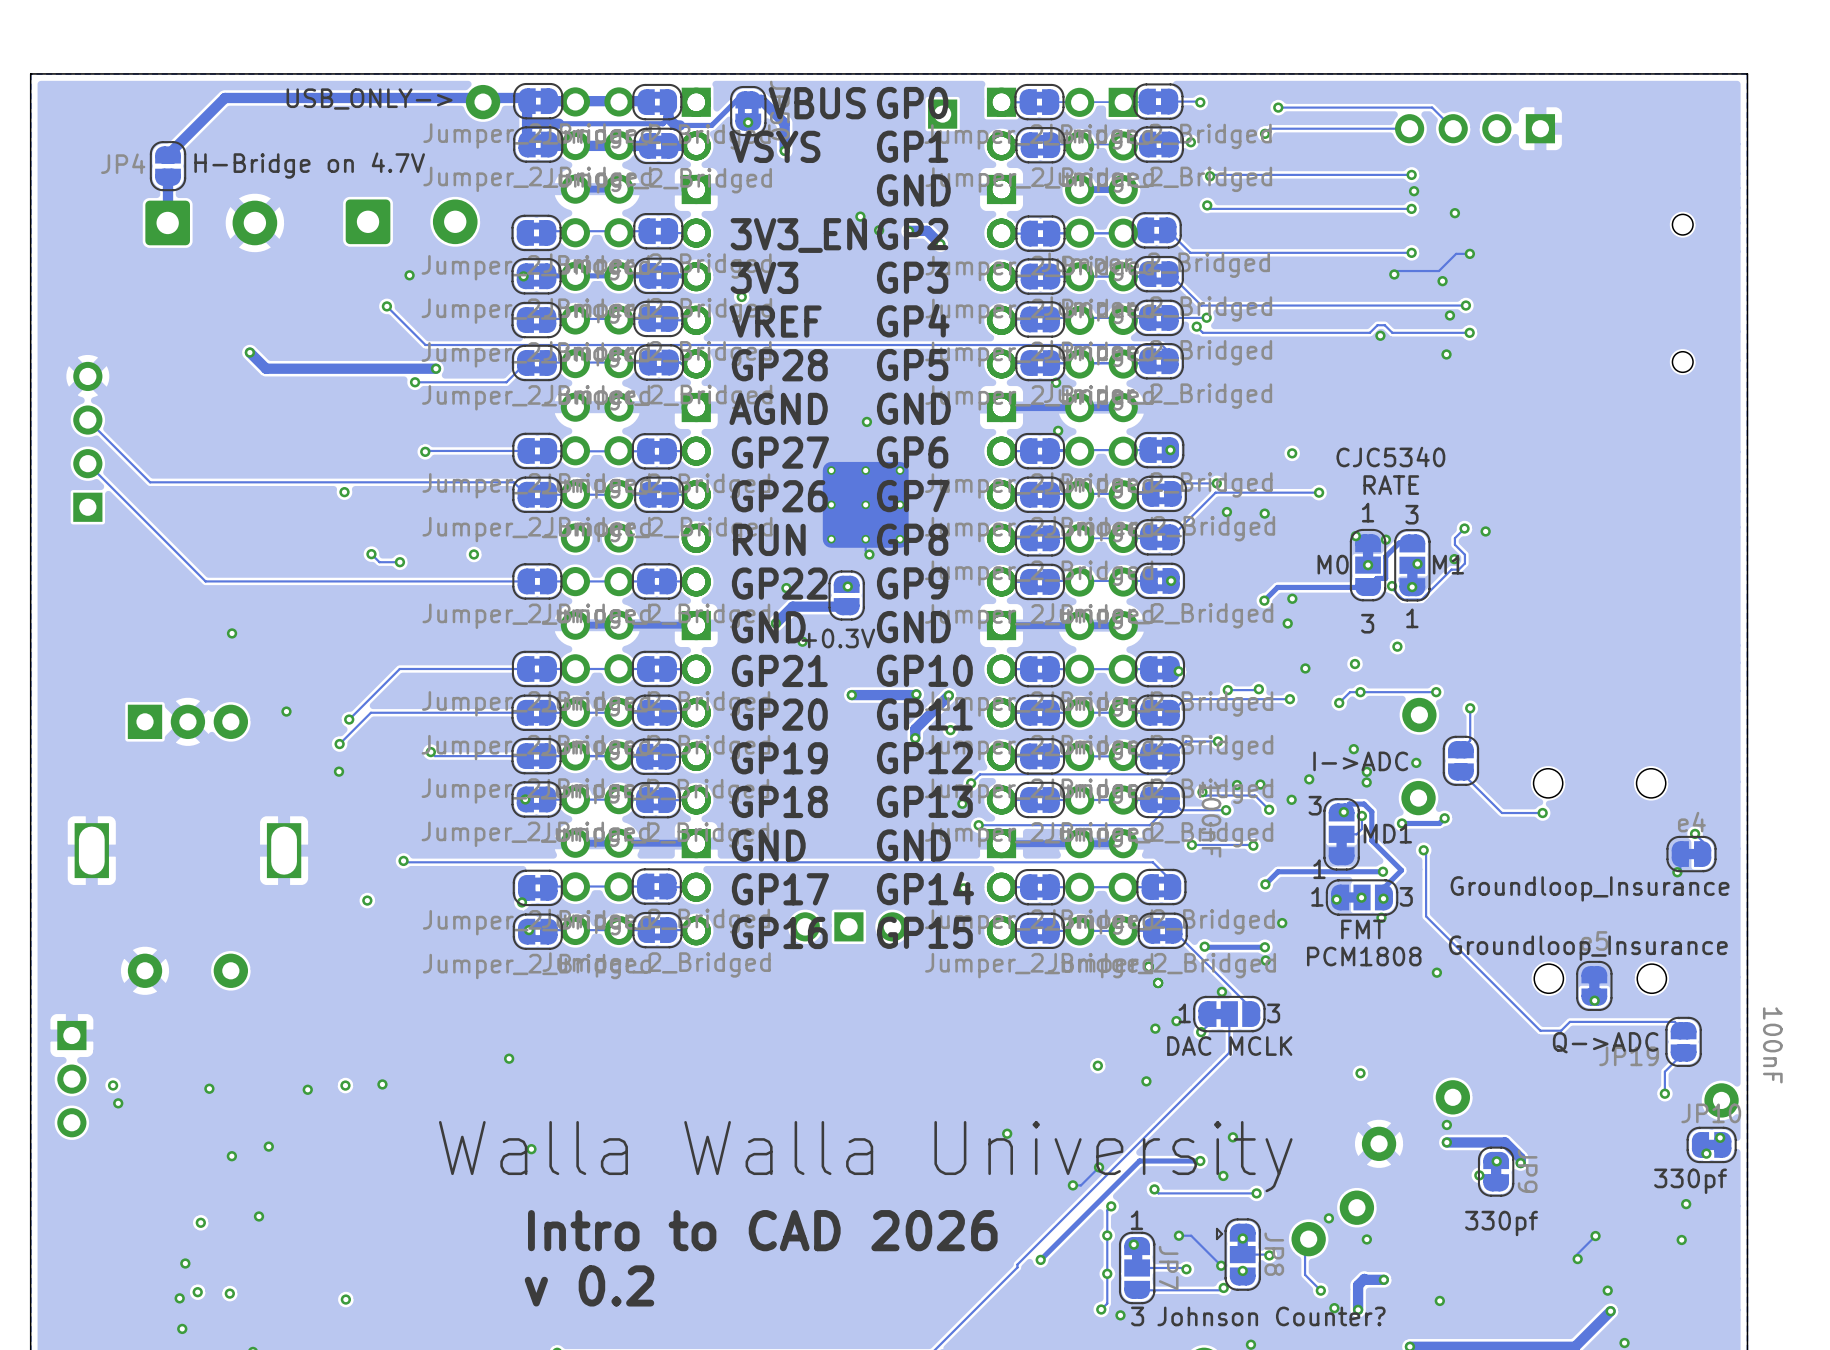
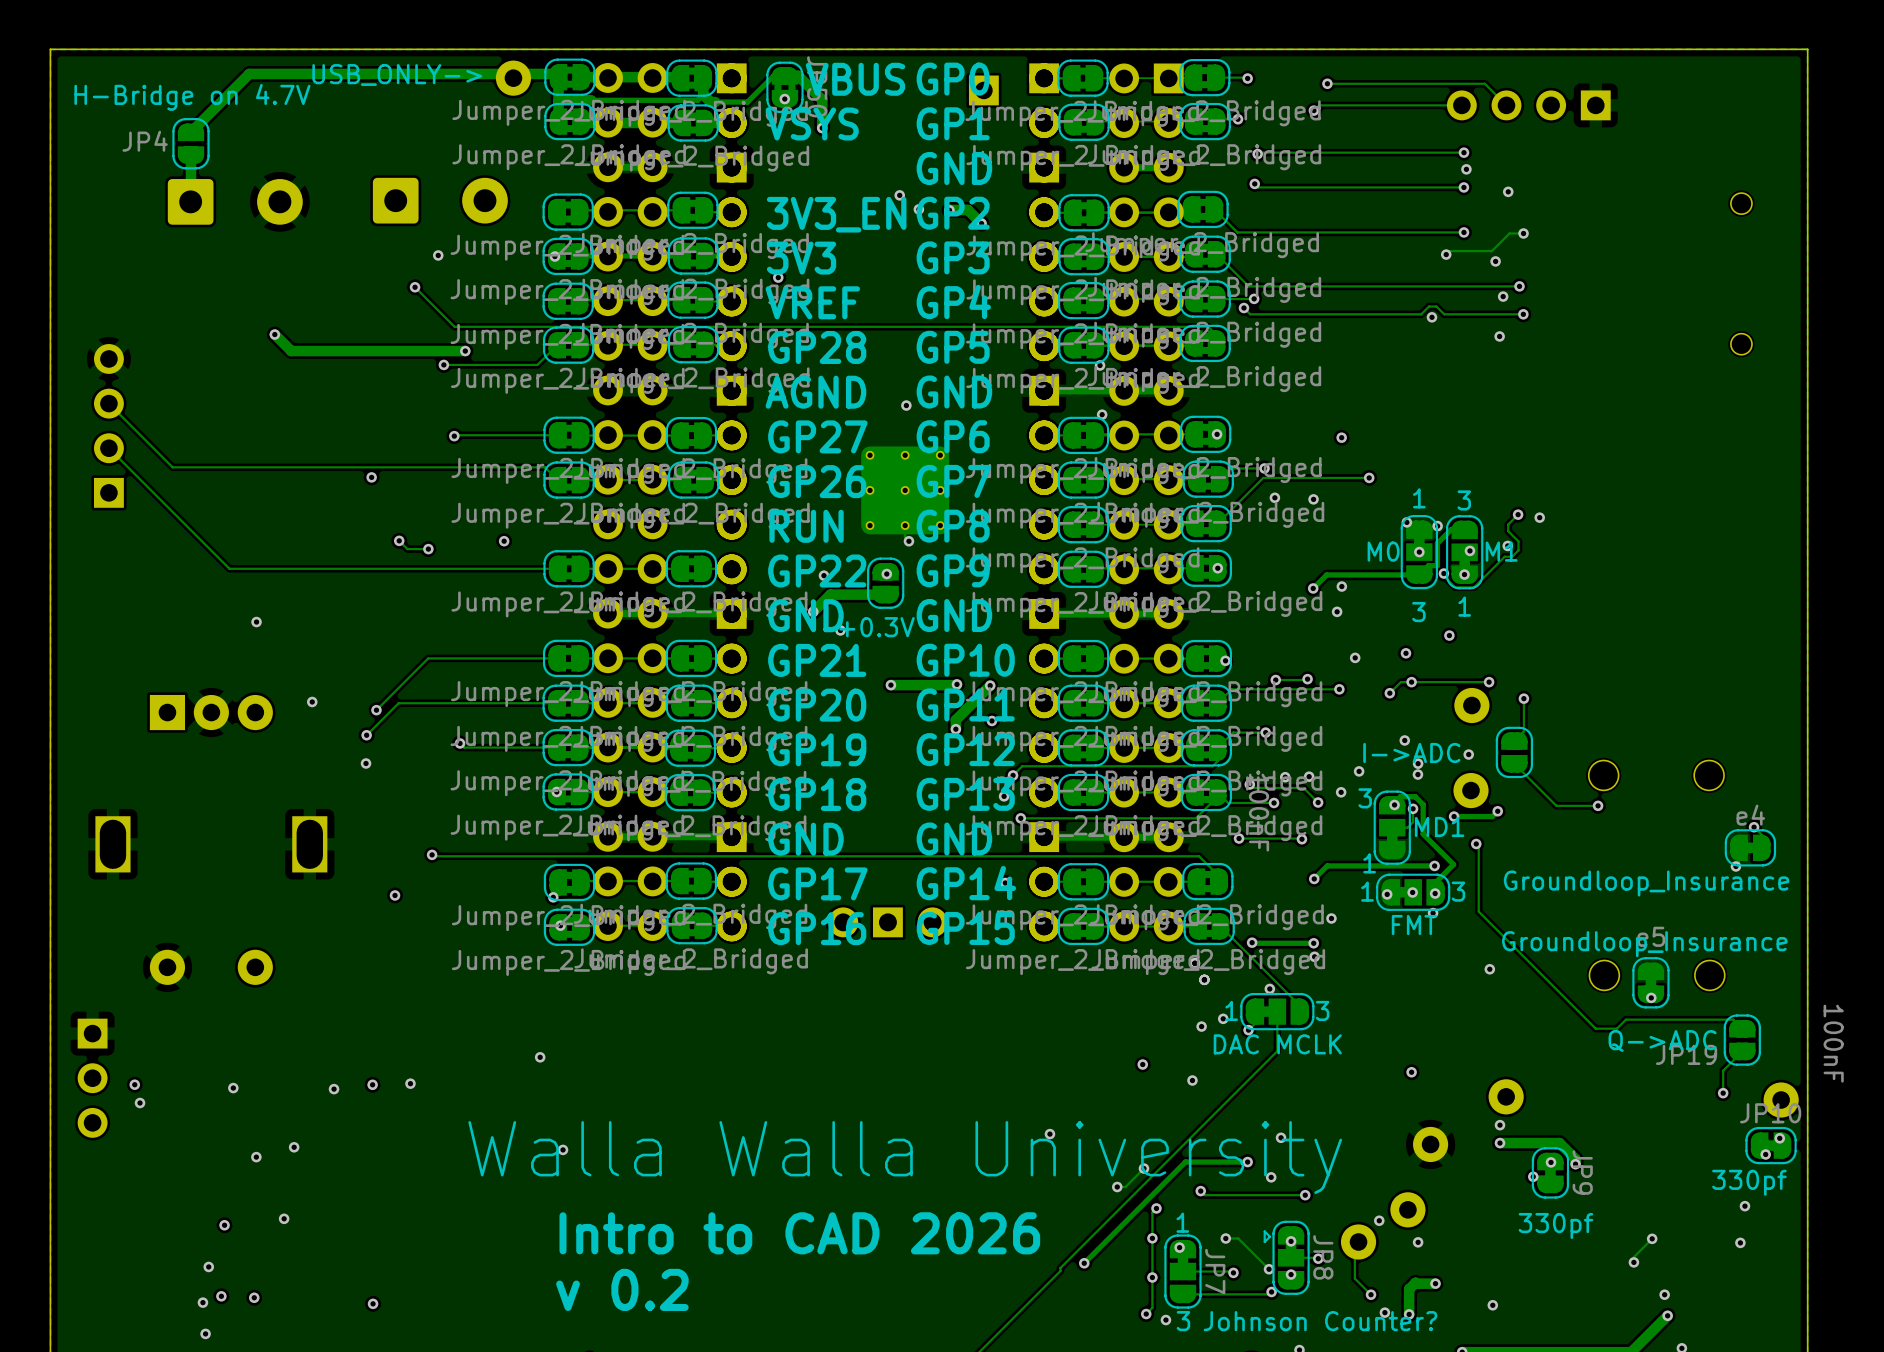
JP4 value position: H-Bridge on 4.7V (309, 165) -> H-Bridge on 4.7V (192, 97)
text: CJC5340 (1390, 457) -> none
text: RATE (1391, 485) -> none
text: PCM1808 (1364, 956) -> none

